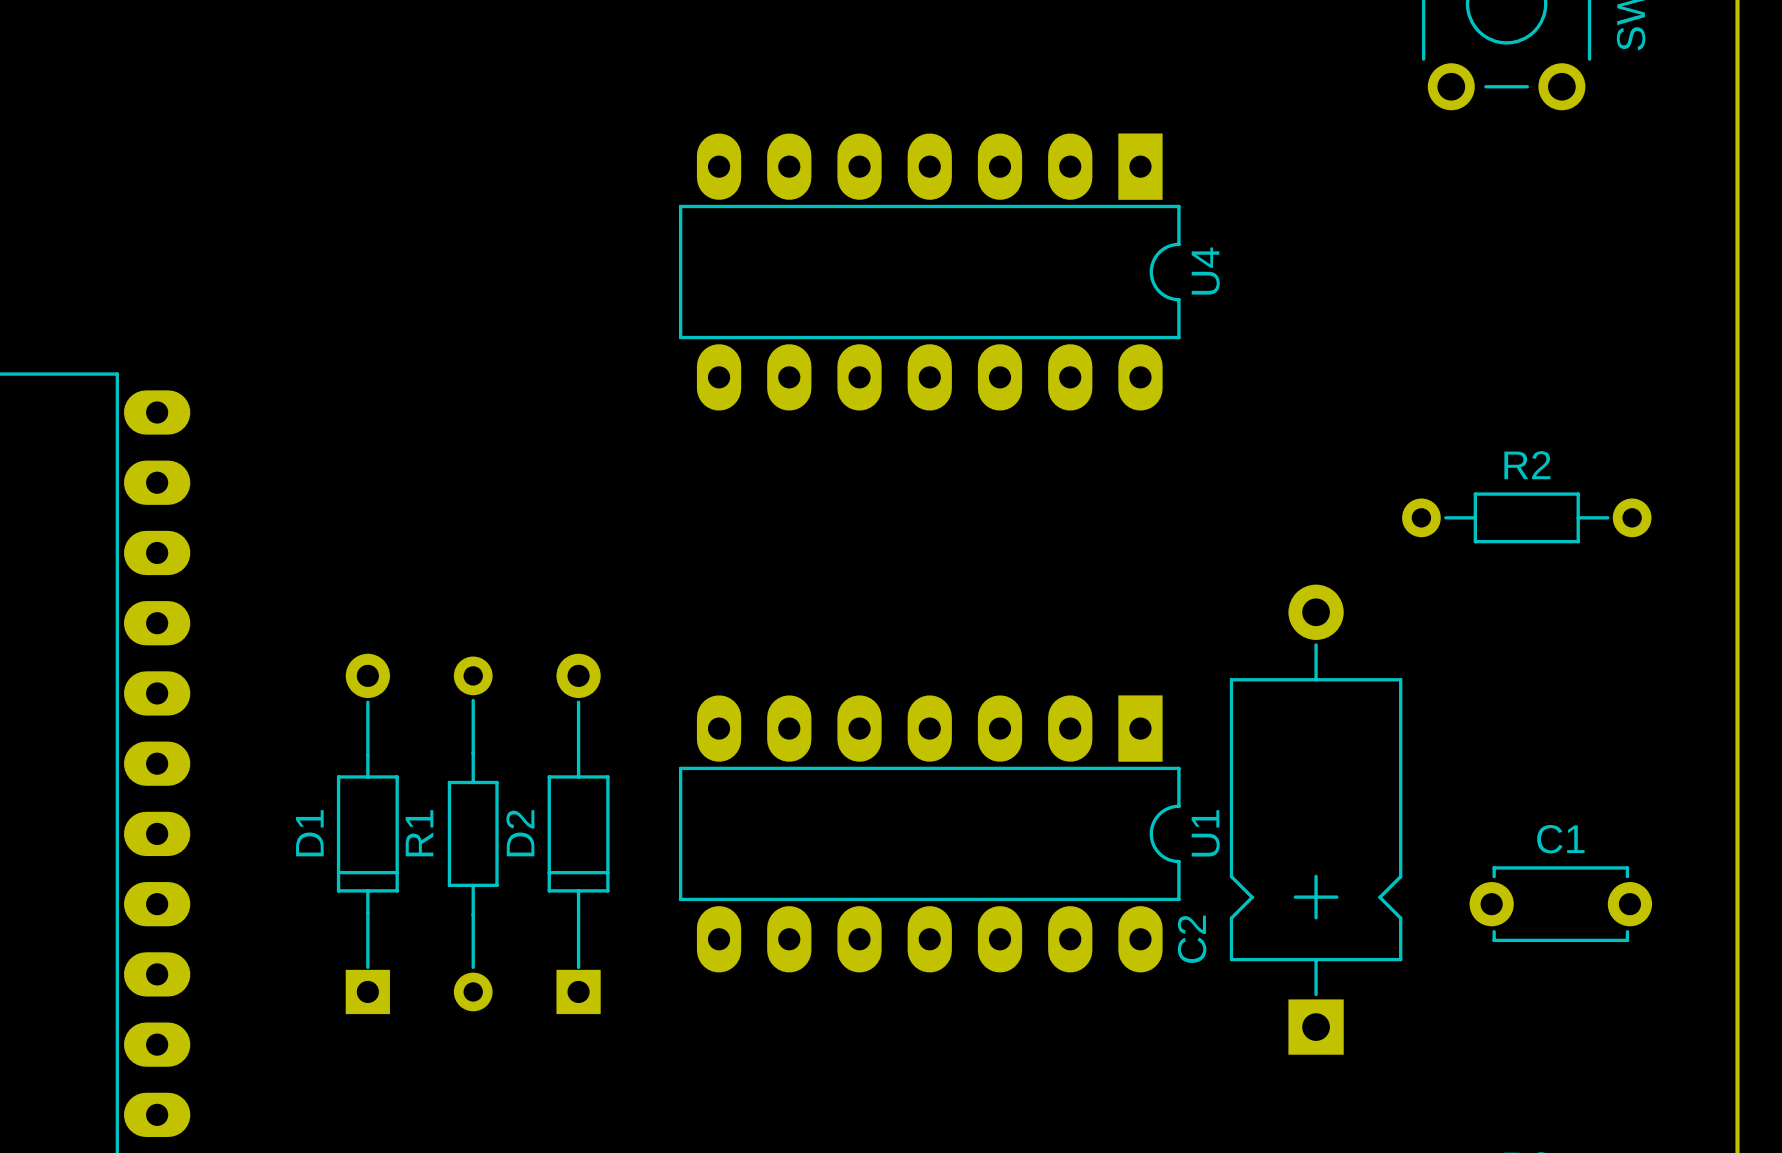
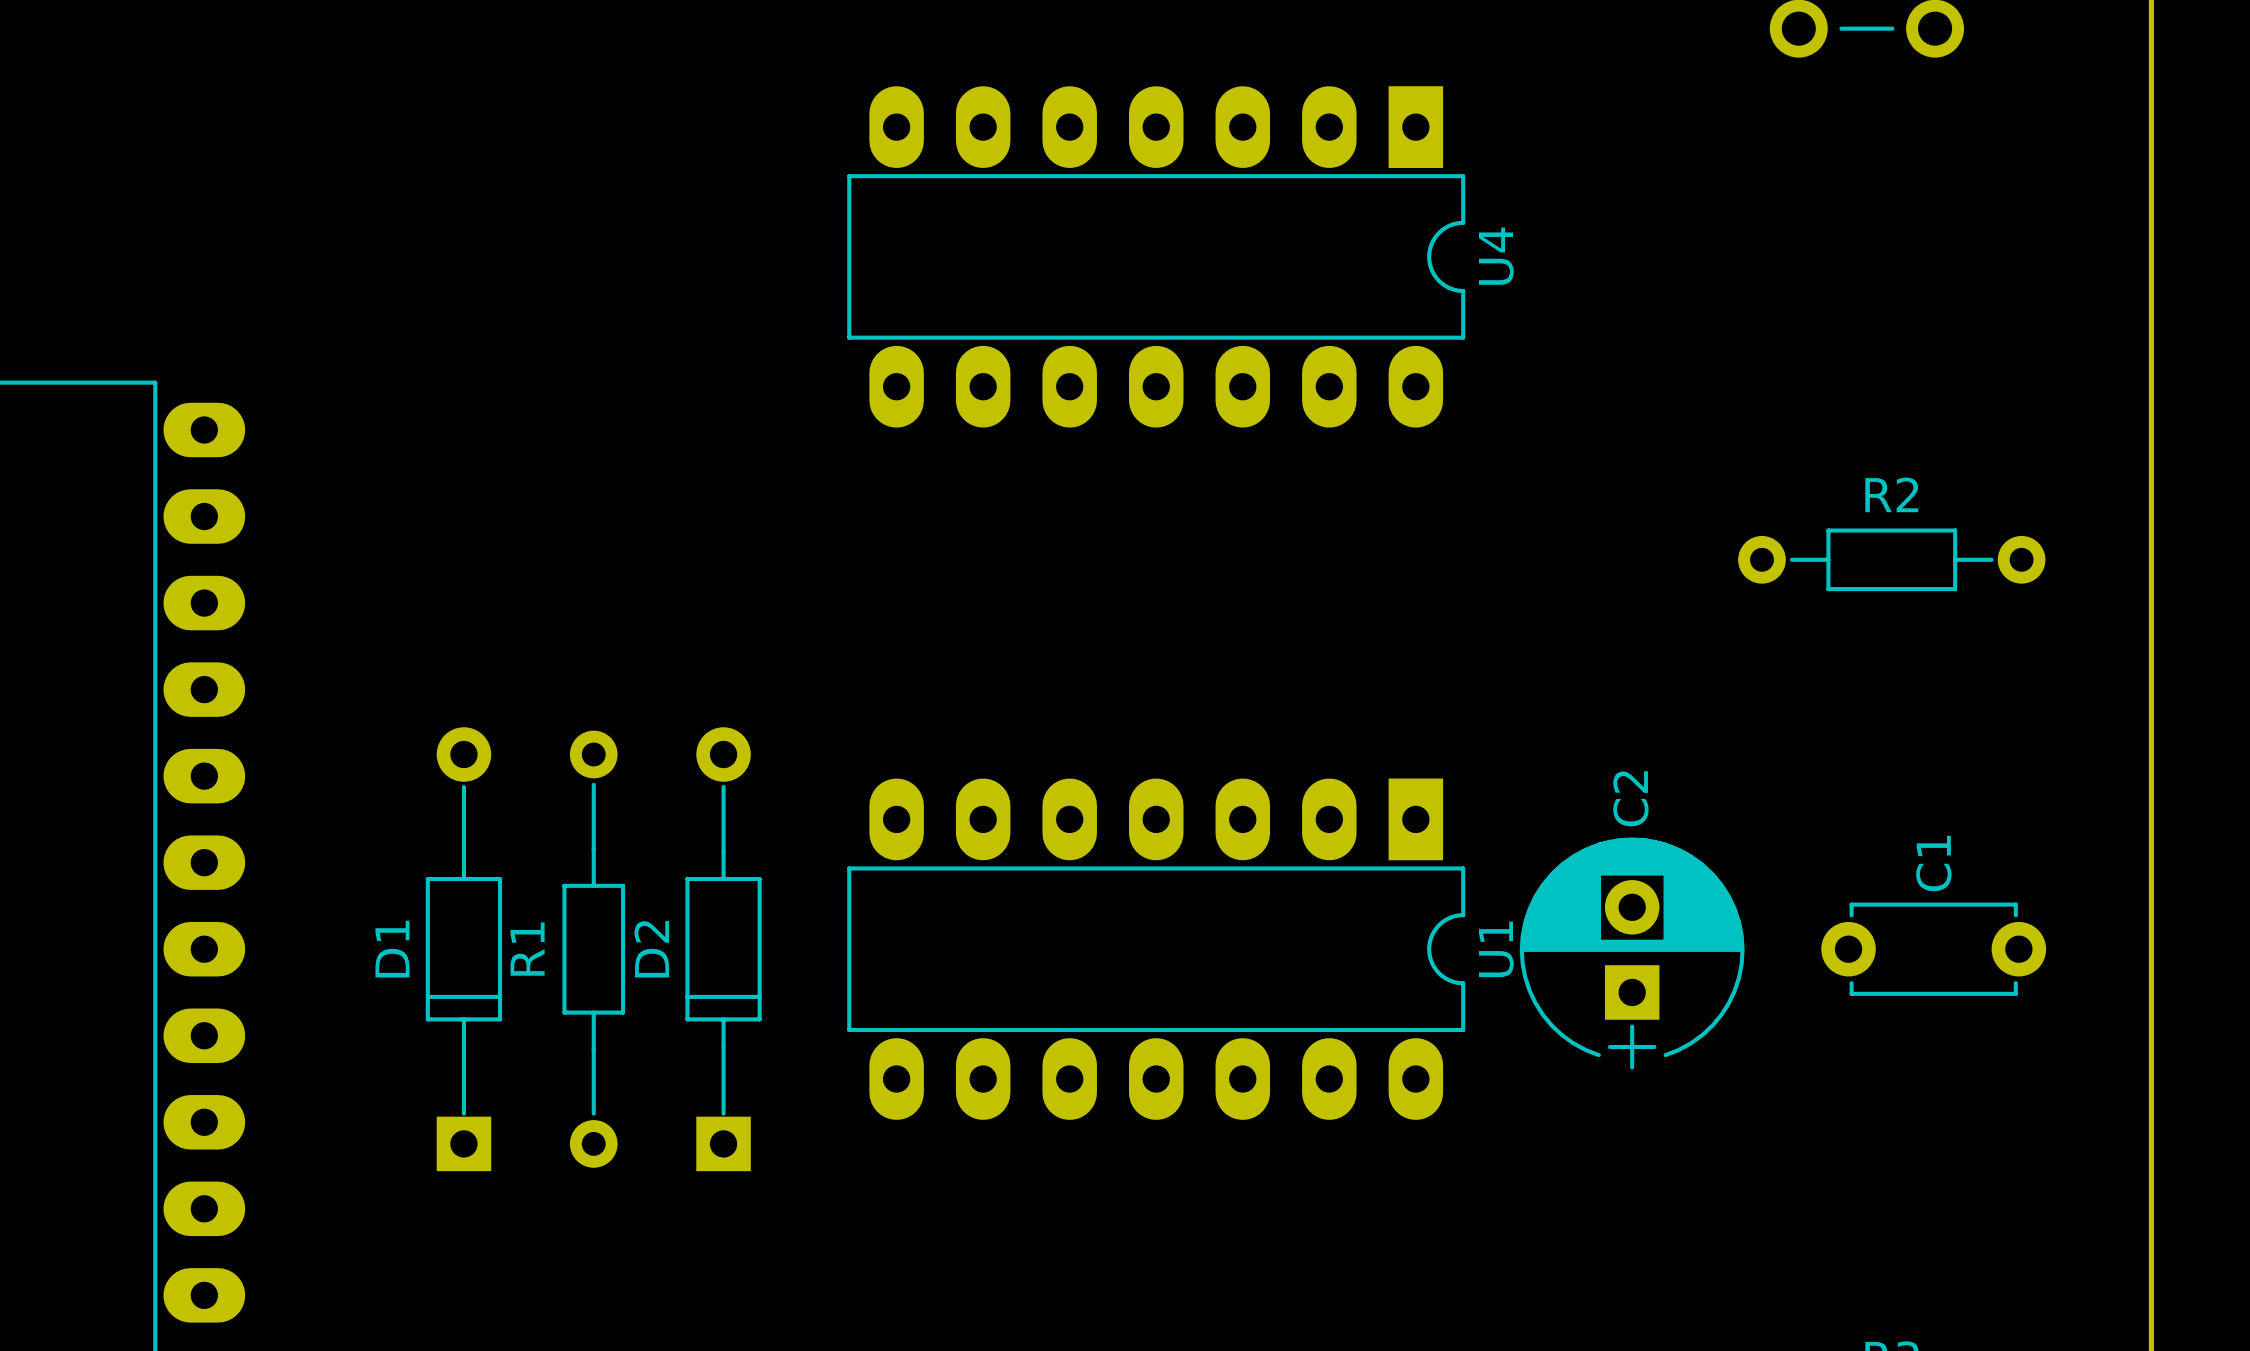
C2 footprint: [1229, 584, 1403, 1055] -> [1519, 837, 1745, 1070]
C1 name rotation: 0° (1560, 839) -> 90° counterclockwise (1933, 863)
C1 position: (1560, 904) -> (1933, 949)
C2 name position: C2 (1192, 939) -> C2 (1630, 798)

